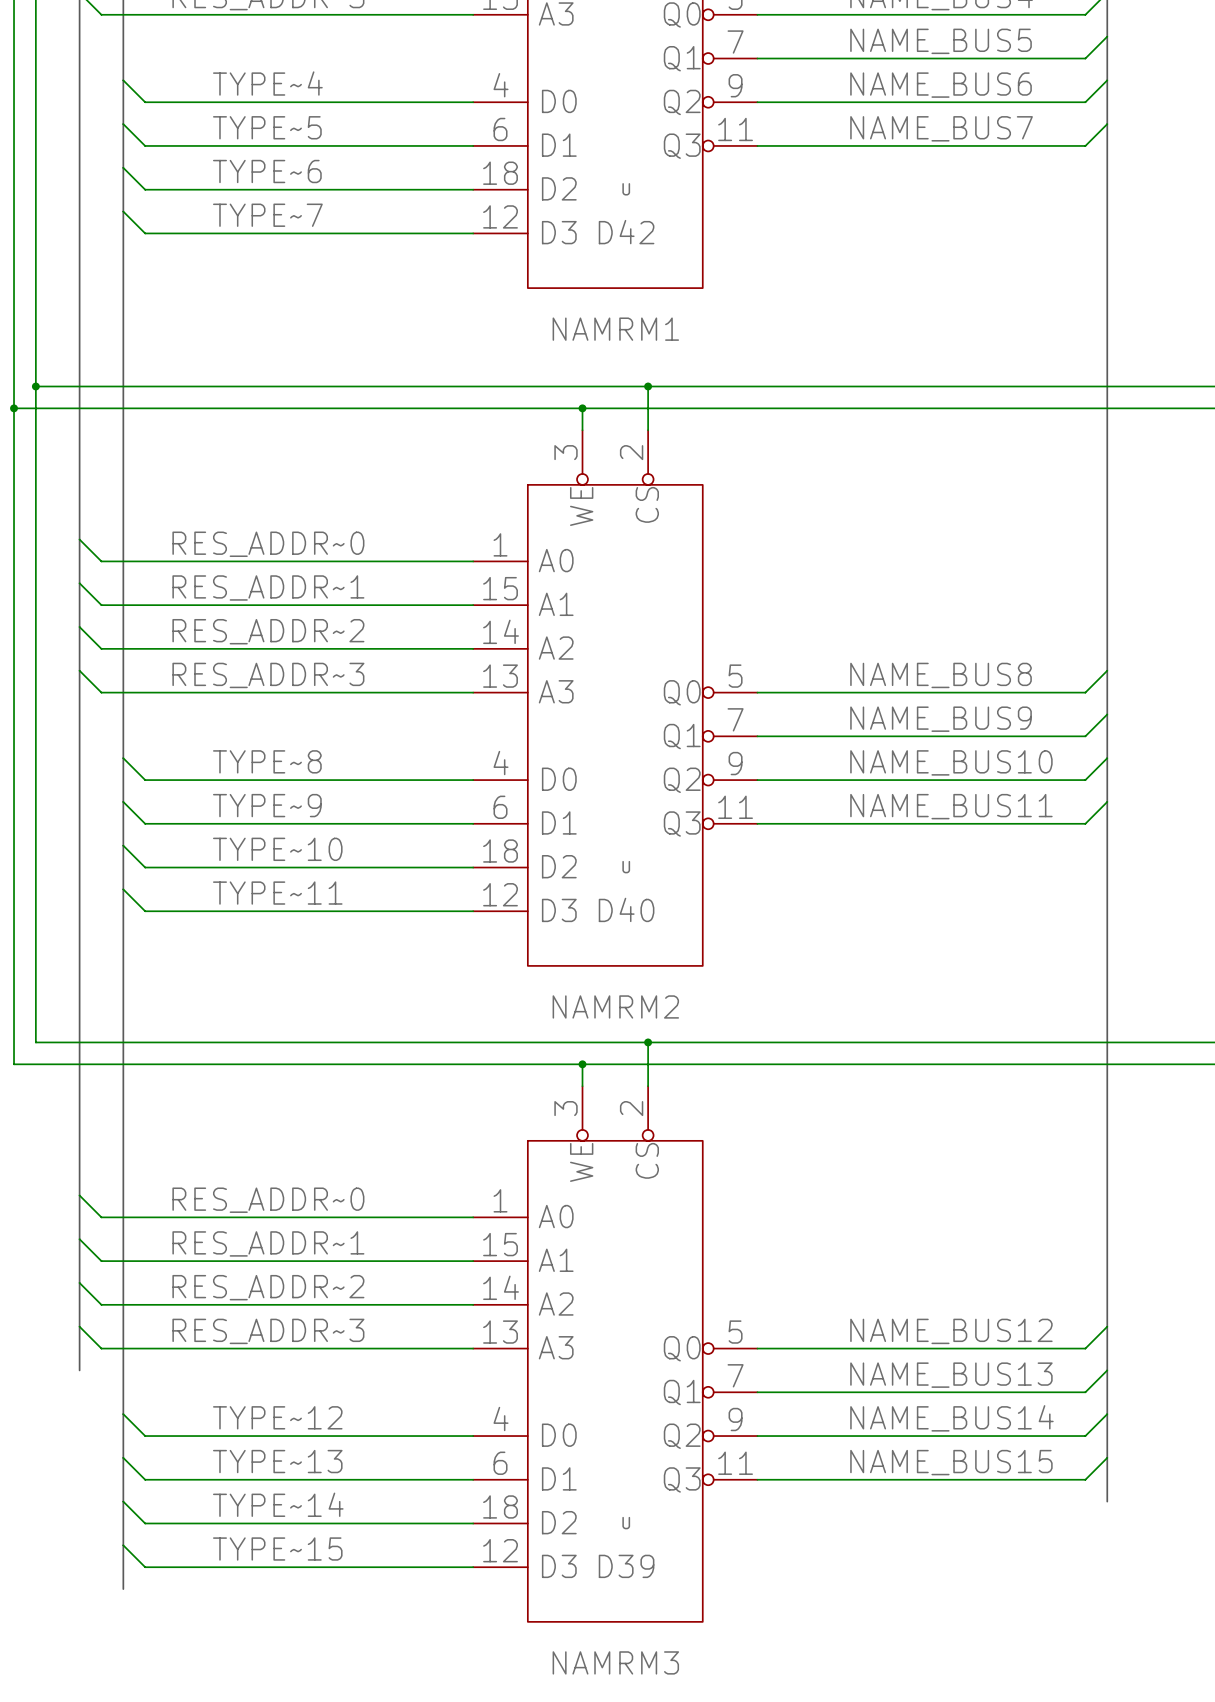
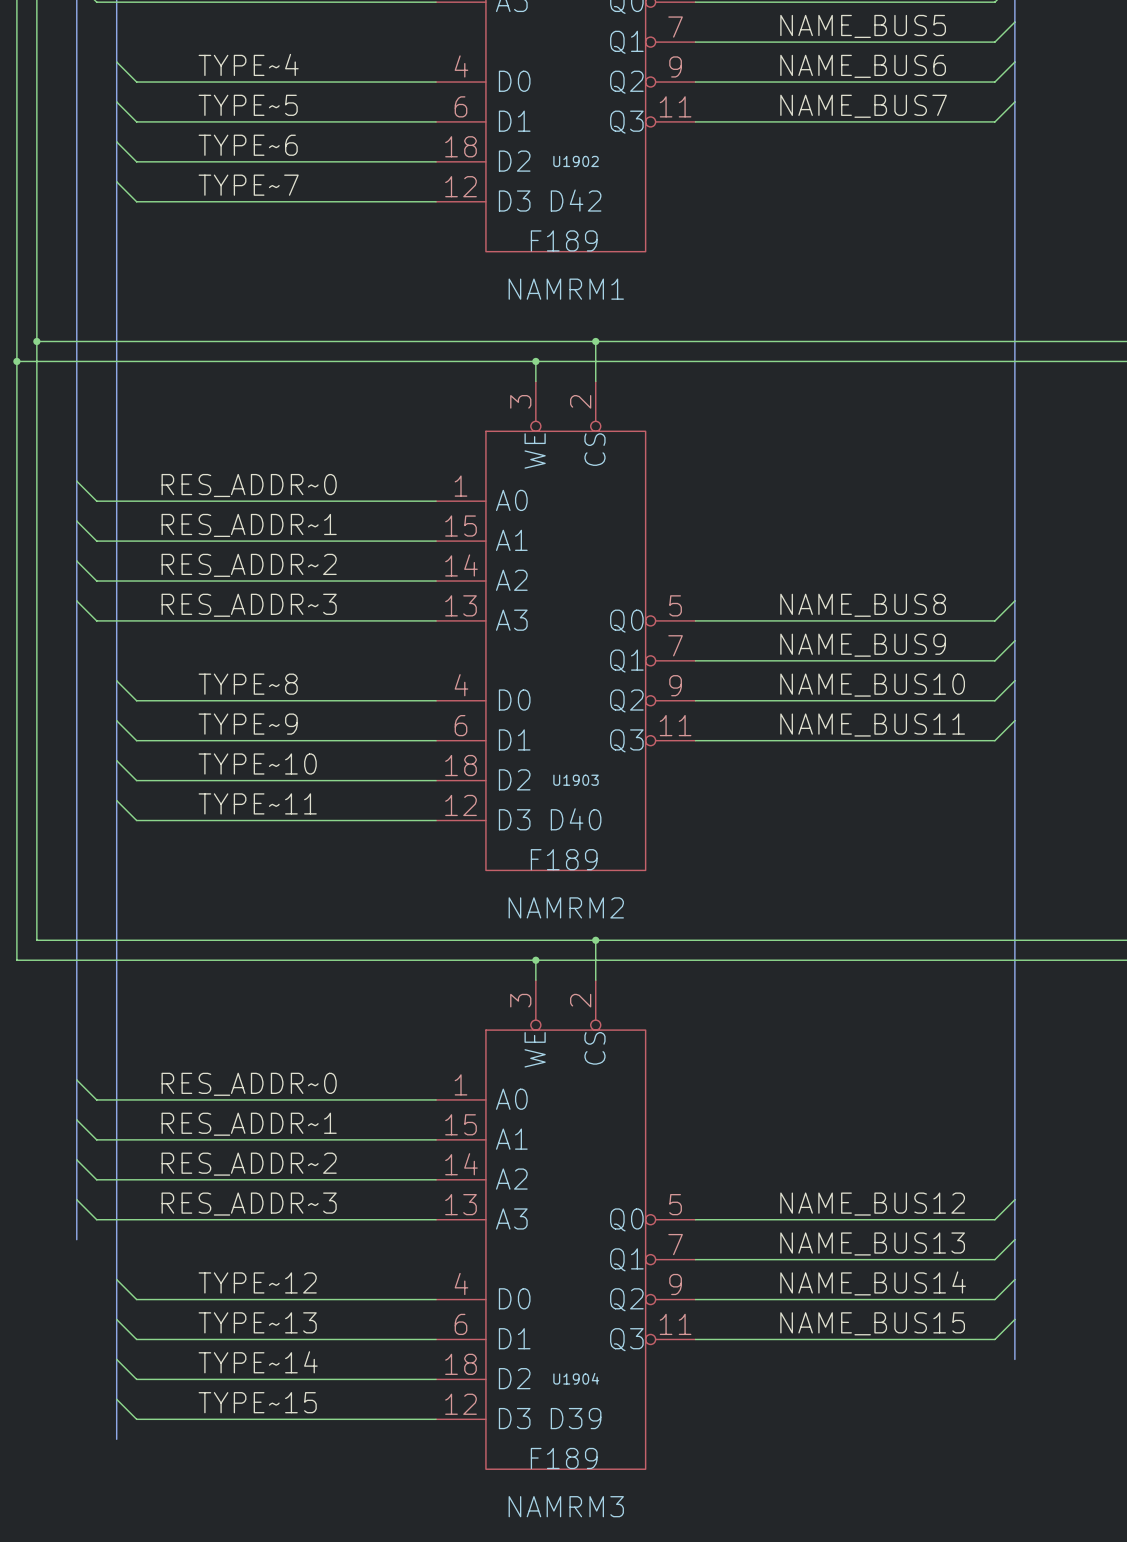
U name: U (626, 189) -> U1902 (576, 161)
U value: none -> F189 (564, 240)
U name: U (626, 867) -> U1903 (576, 780)
U value: none -> F189 (564, 859)
U name: U (626, 1523) -> U1904 (576, 1378)
U value: none -> F189 (564, 1458)

